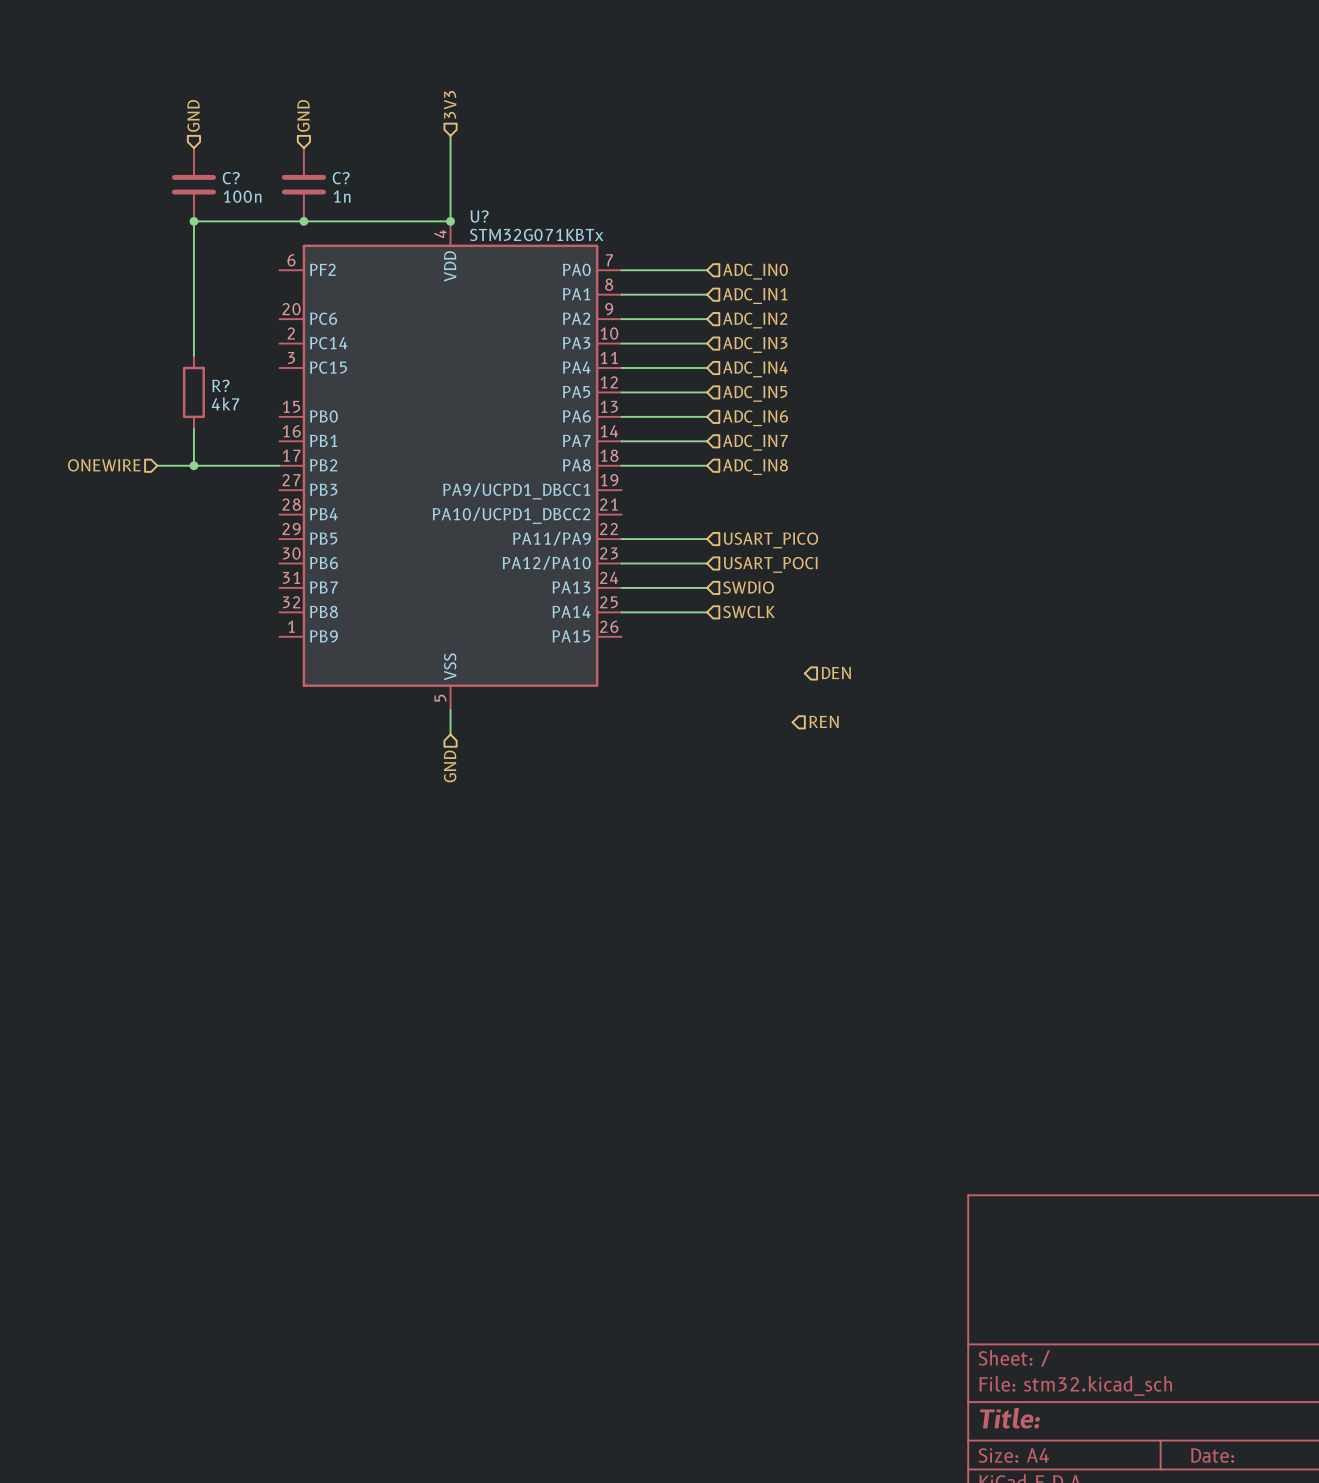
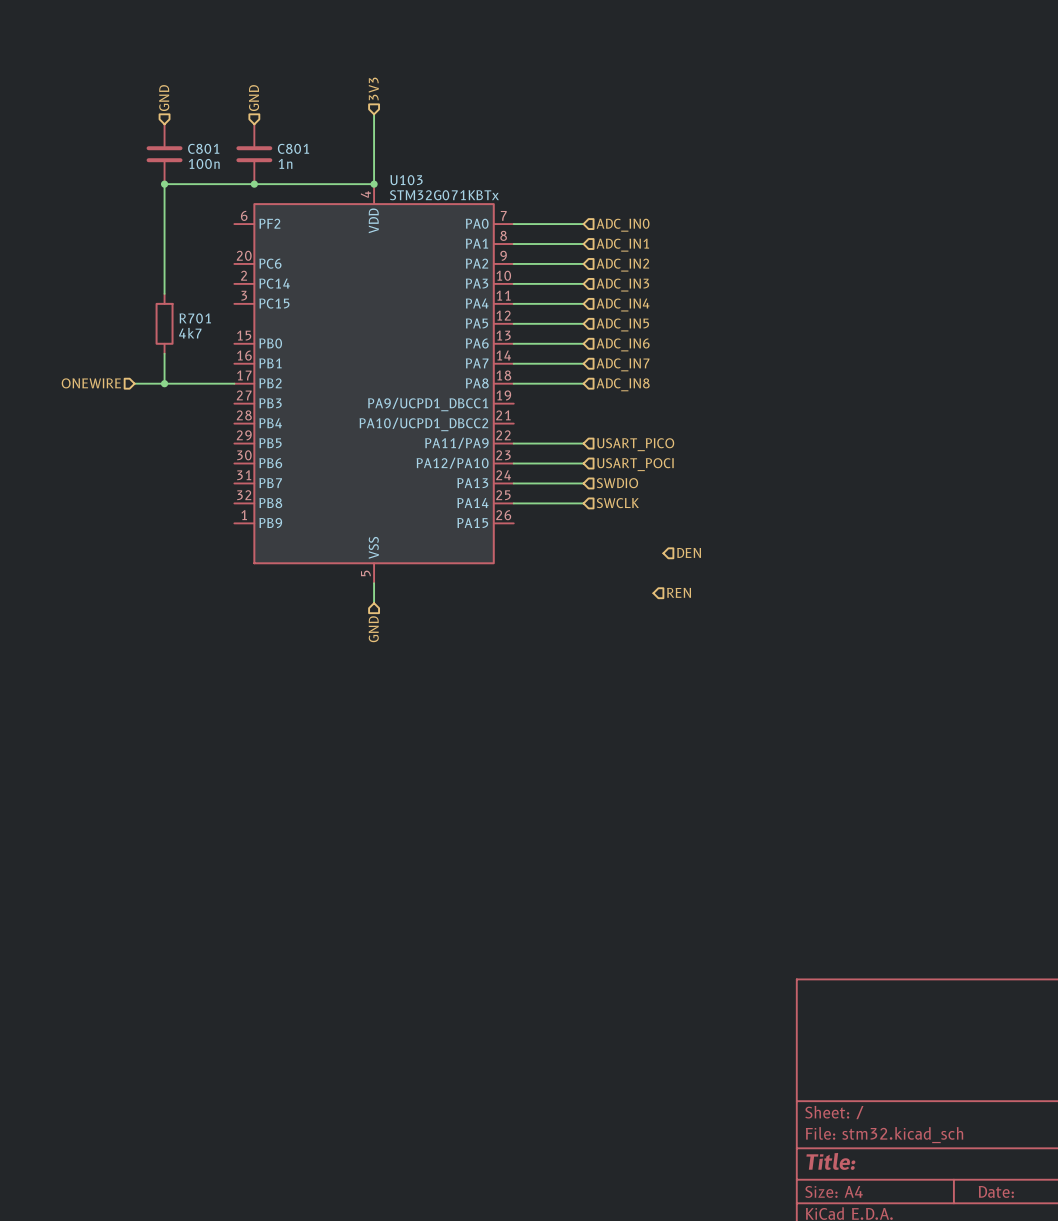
C? name: C? (231, 178) -> C801 (203, 148)
C? name: C? (341, 178) -> C801 (293, 148)
U? name: U? (479, 216) -> U103 (406, 180)
R? name: R? (220, 385) -> R701 (195, 318)

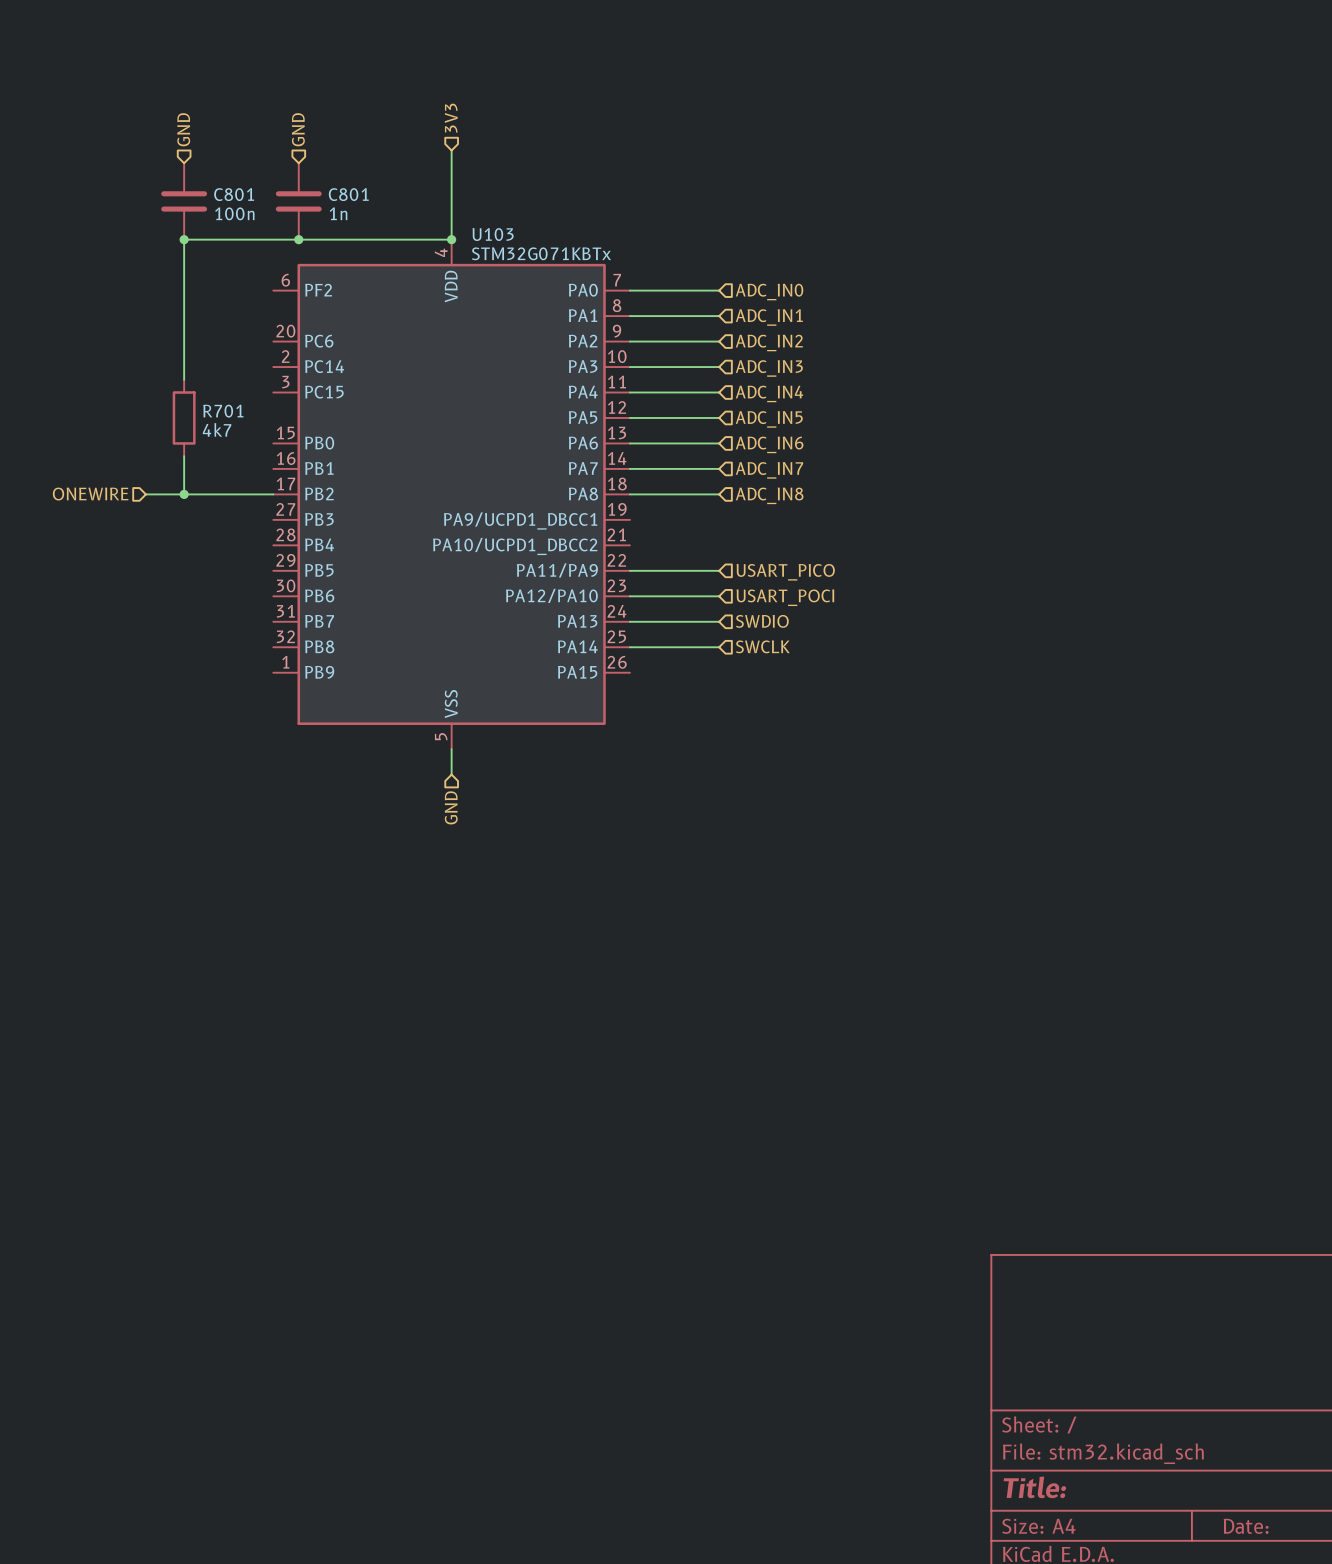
hierarchical label: DEN (689, 552) -> none
hierarchical label: REN (679, 592) -> none

